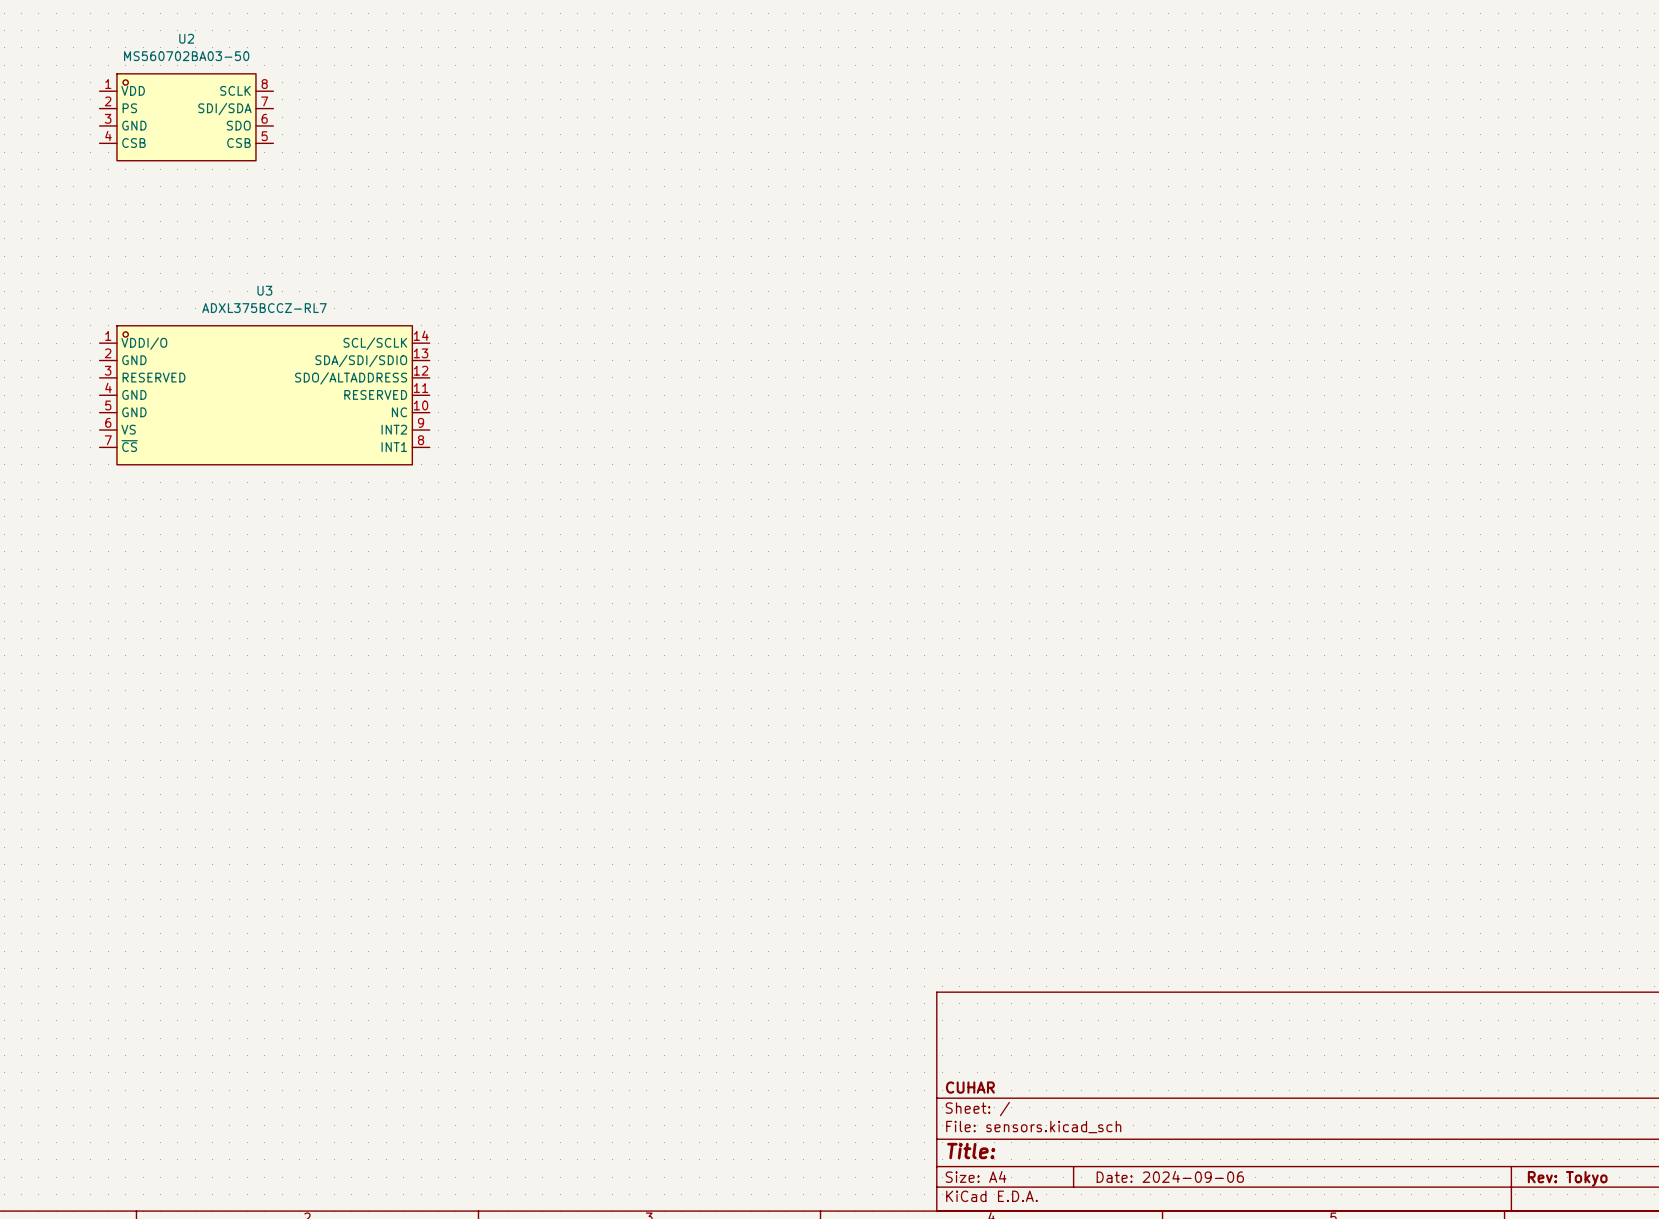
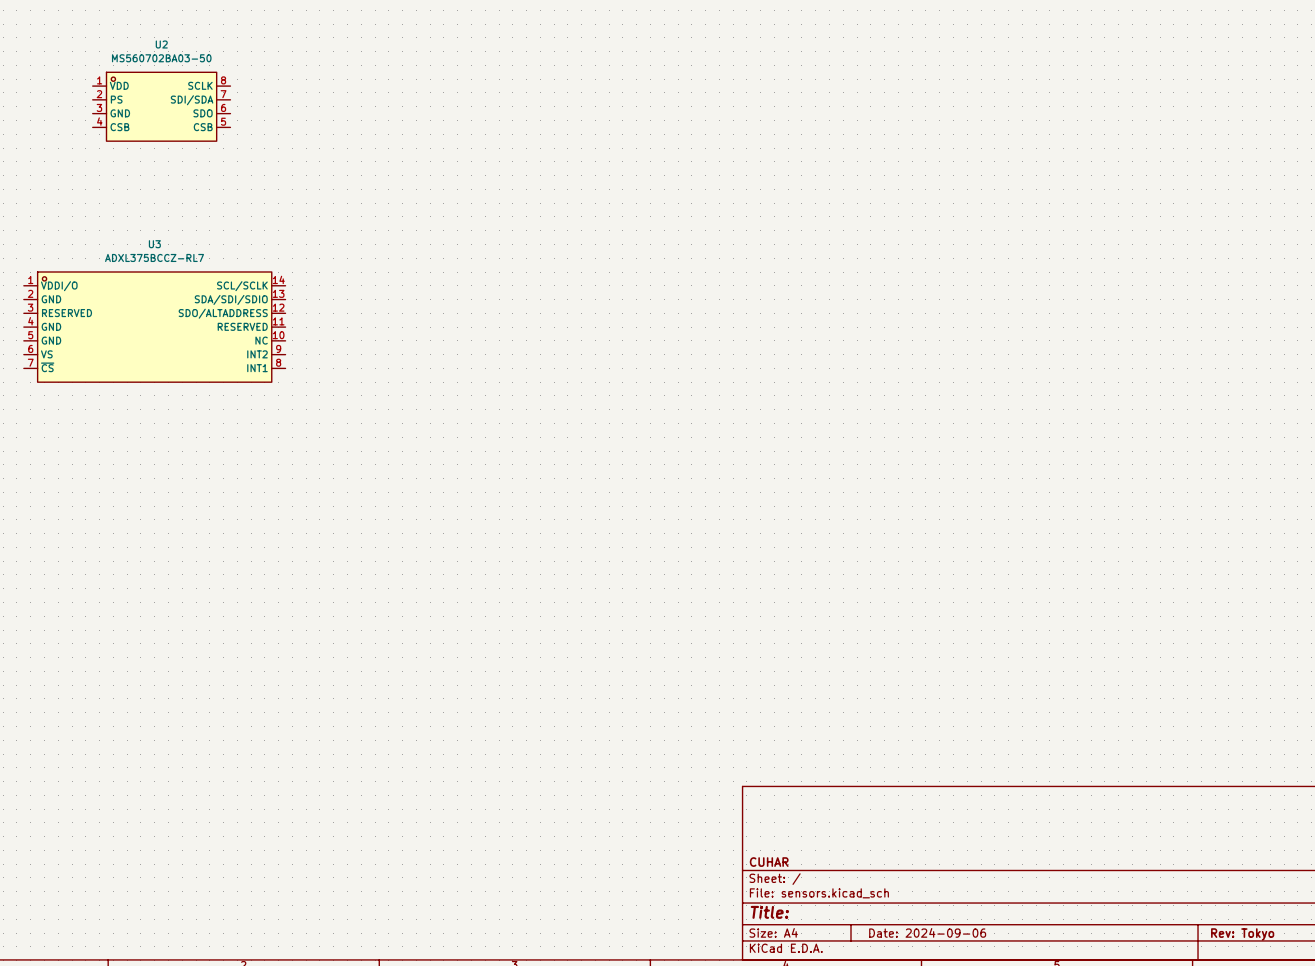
U2 position: (186, 117) -> (161, 106)
U3 position: (264, 395) -> (154, 327)

